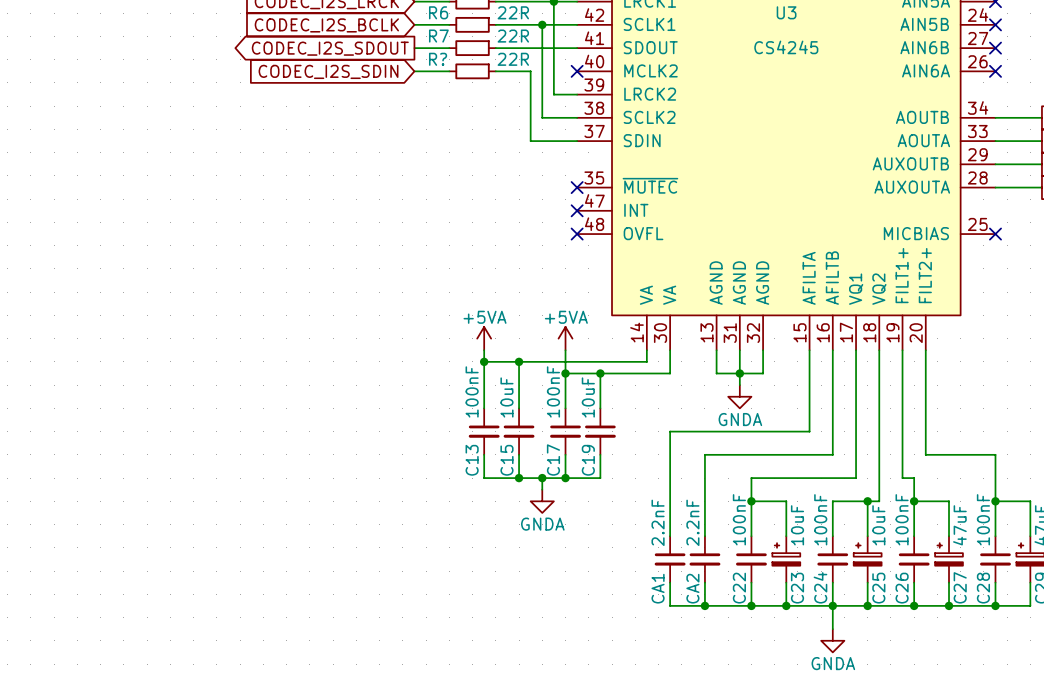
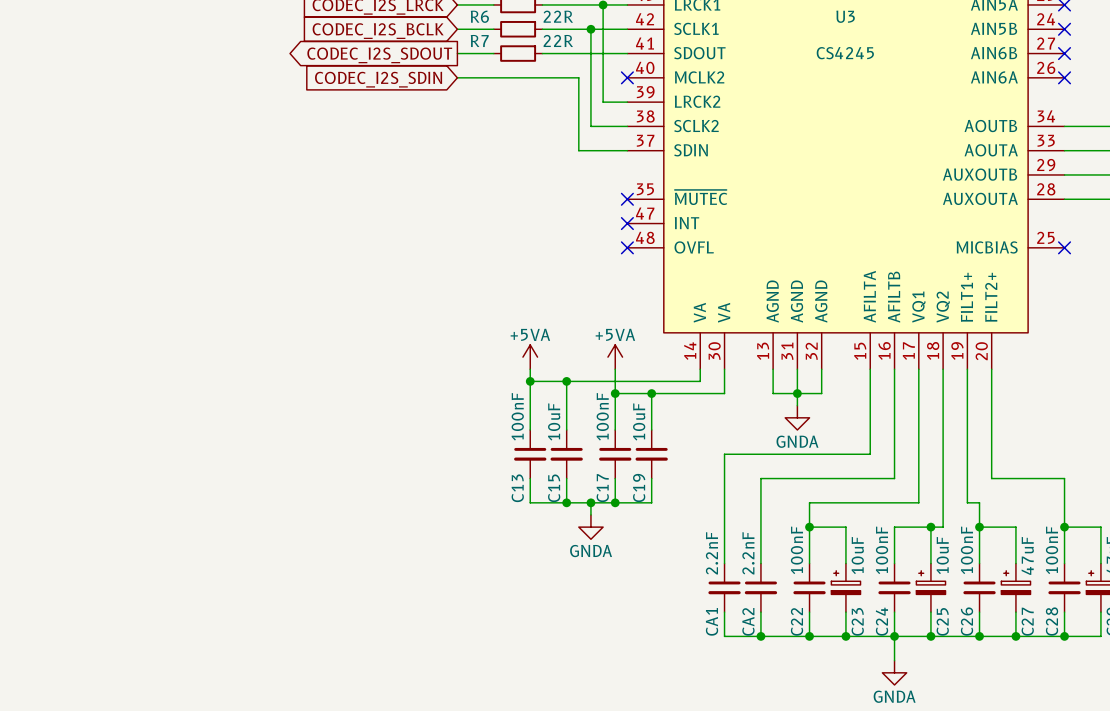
wire: none -> (493, 77) (542, 77)
R?: 22R (472, 71) -> none

